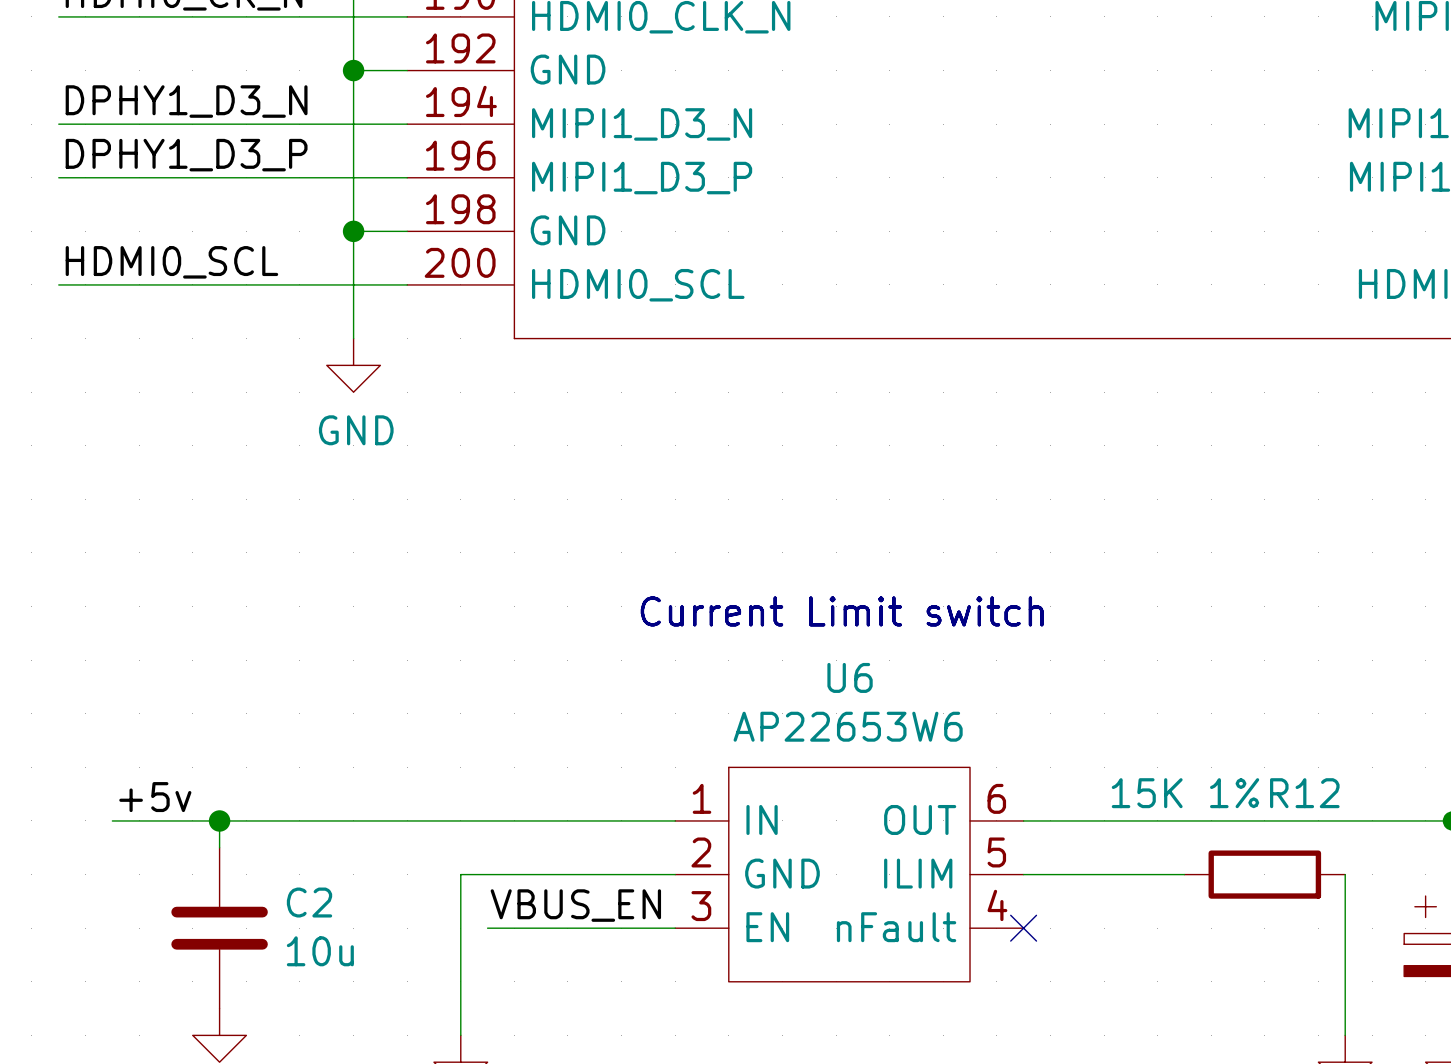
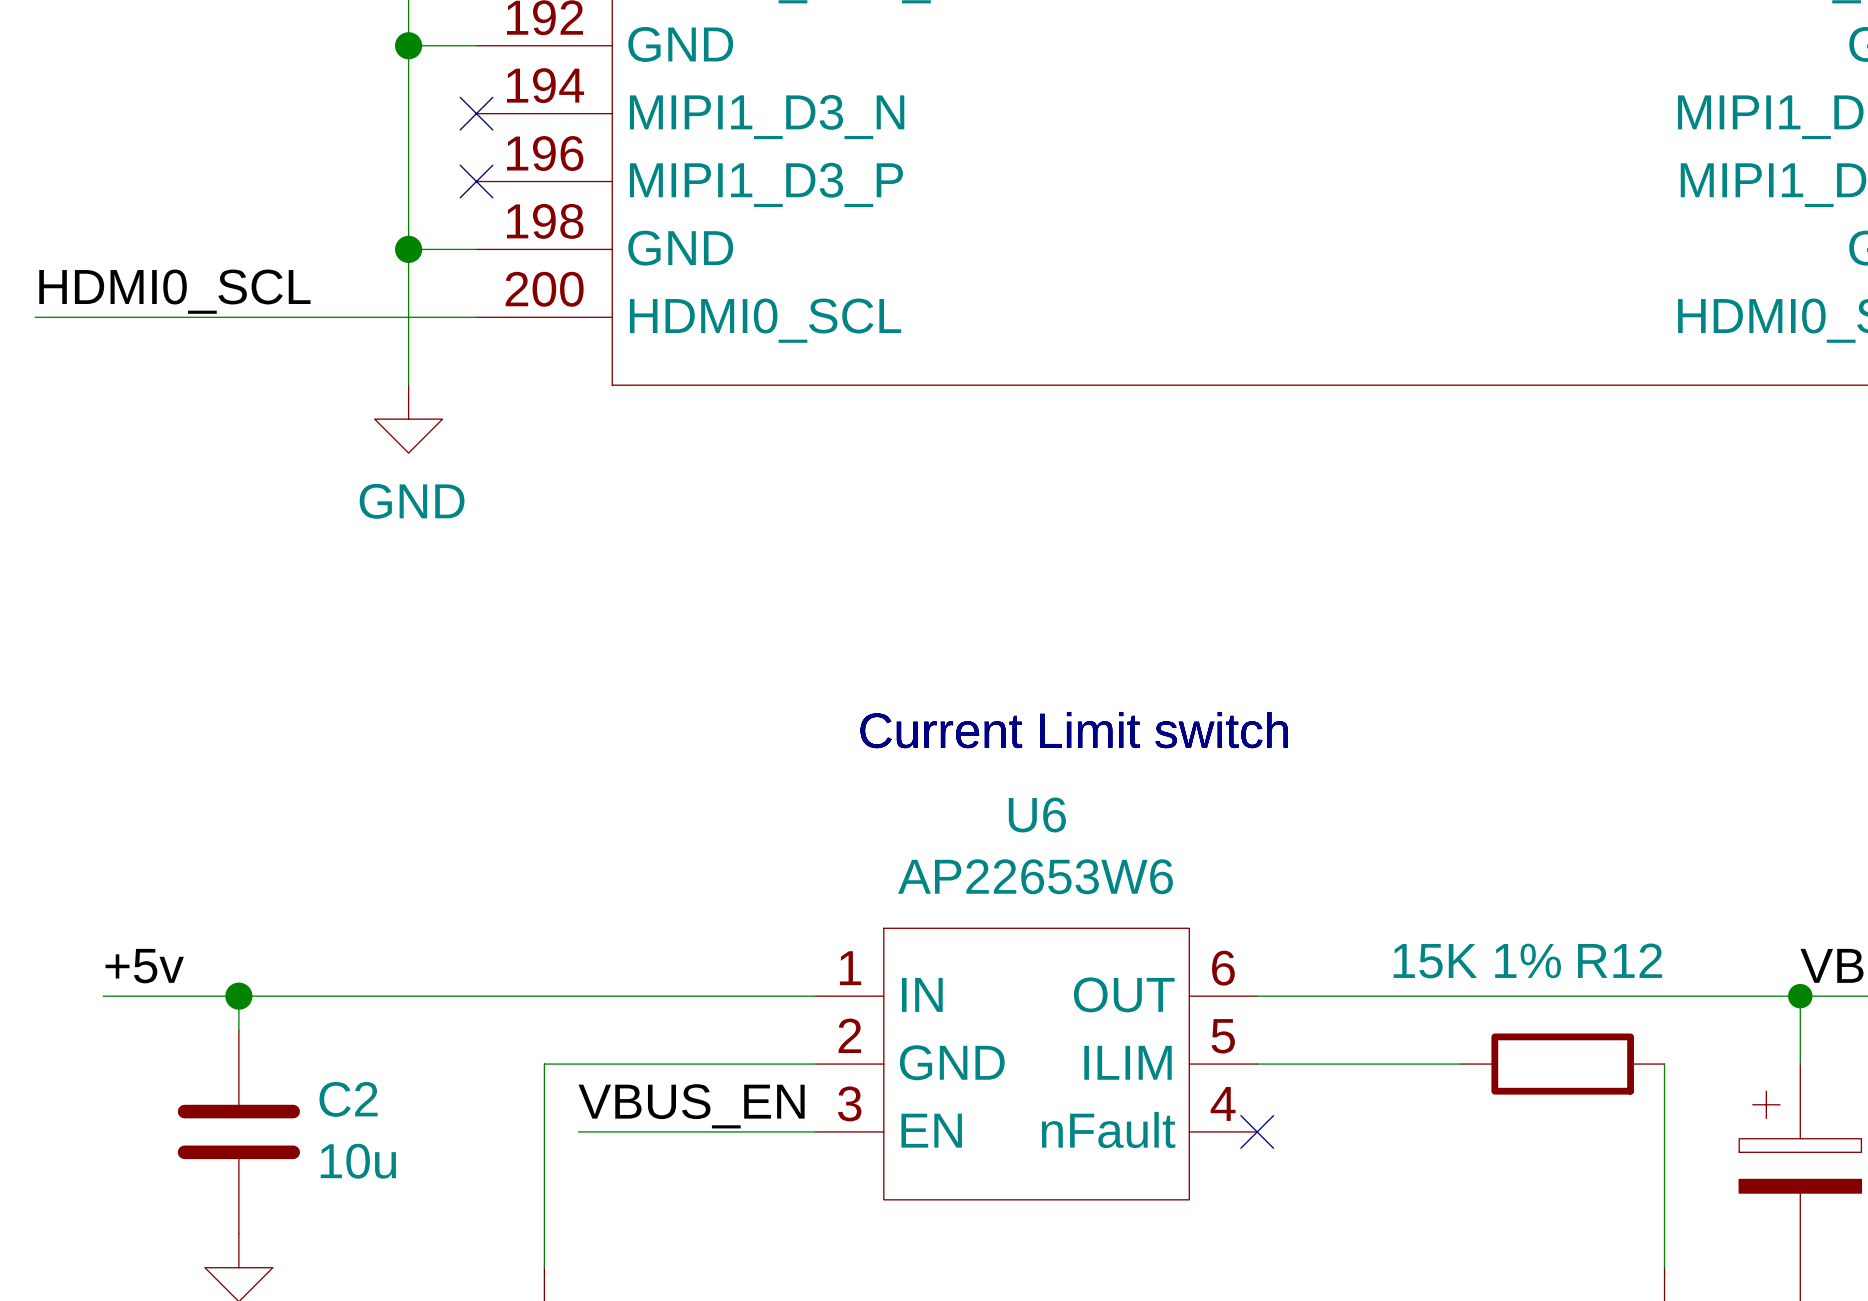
label: DPHY1_D3_N (186, 101) -> none
wire: (58, 124) (407, 124) -> none
no-connect mark: none -> (476, 113)
label: DPHY1_D3_P (186, 155) -> none
wire: (58, 177) (407, 177) -> none
no-connect mark: none -> (476, 181)

